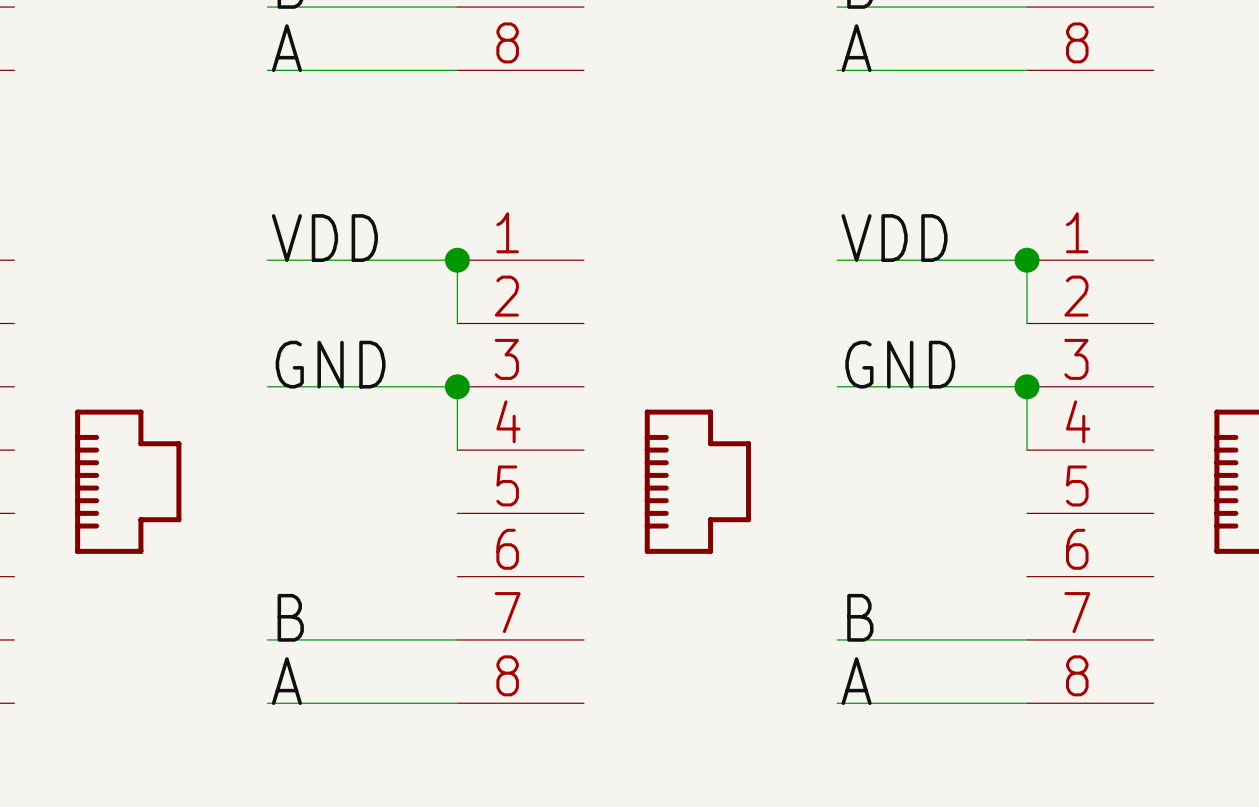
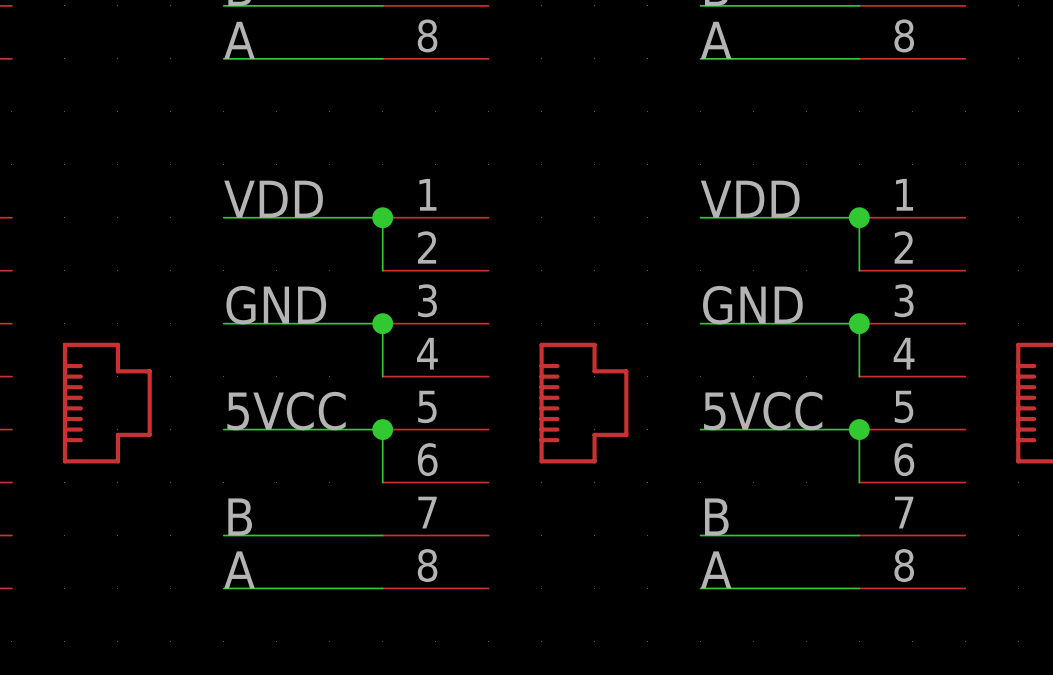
label: none -> 5VCC (286, 411)
label: none -> 5VCC (763, 411)
wire: none -> (223, 429) (382, 429) (382, 482)
junction: none -> (382, 429)
wire: none -> (700, 429) (859, 429) (859, 482)
junction: none -> (859, 429)

